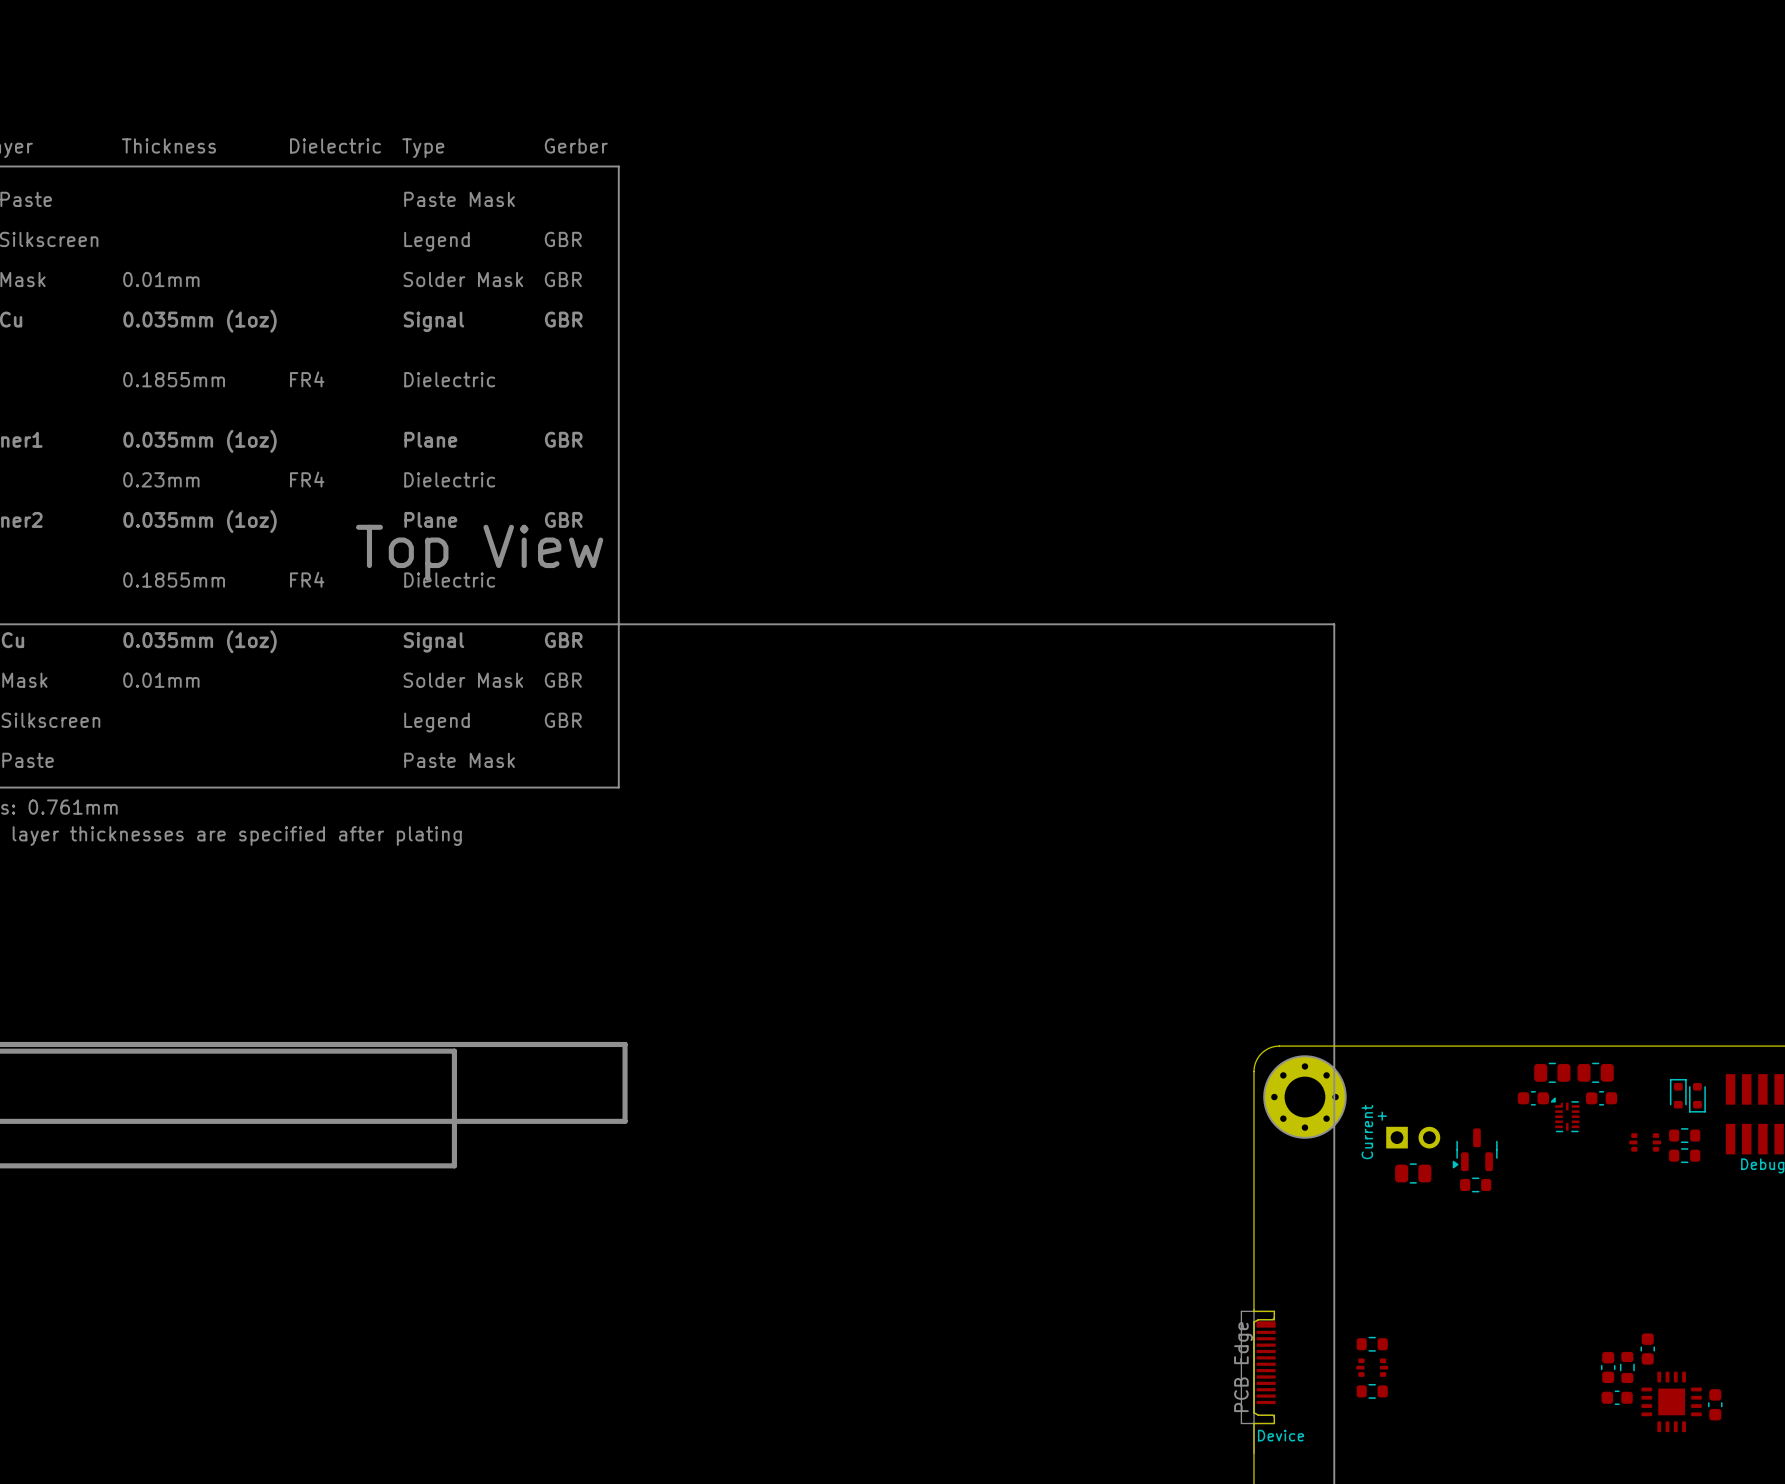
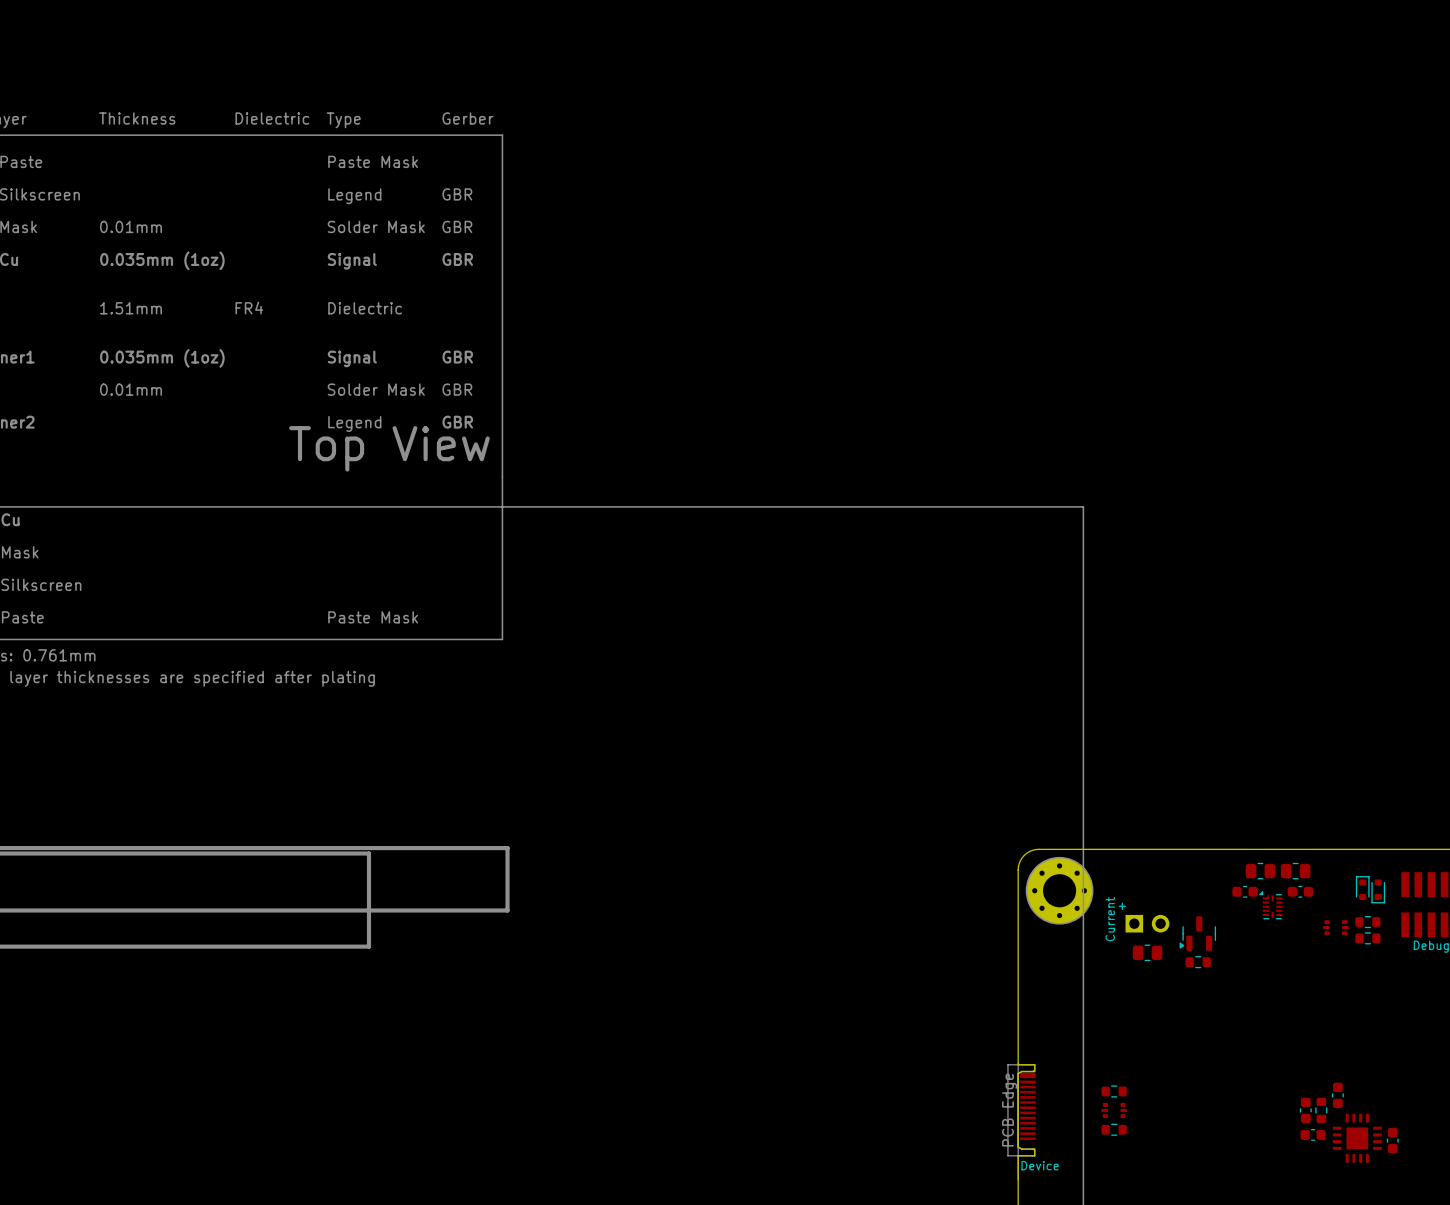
text: 0.1855mm (174, 379) -> 1.51mm (131, 308)
text: Plane (430, 439) -> Signal (352, 358)
text: 0.23mm (161, 479) -> 0.01mm (131, 389)
text: FR4 (307, 479) -> none
text: Dielectric (449, 479) -> Solder Mask (376, 389)
text: none -> GBR (457, 389)
text: Plane (430, 519) -> Legend (354, 423)
text: 0.035mm (1oz) (200, 521) -> none
text: FR4 (307, 579) -> none
text: 0.1855mm (174, 580) -> none
text: Dielectric (449, 580) -> none
text: GBR (563, 640) -> none
text: 0.035mm (1oz) (200, 641) -> none
text: Signal (433, 642) -> none
text: 0.01mm (161, 680) -> none
text: Solder Mask (463, 680) -> none
text: GBR (563, 680) -> none
text: GBR (563, 720) -> none
text: Legend (436, 722) -> none

